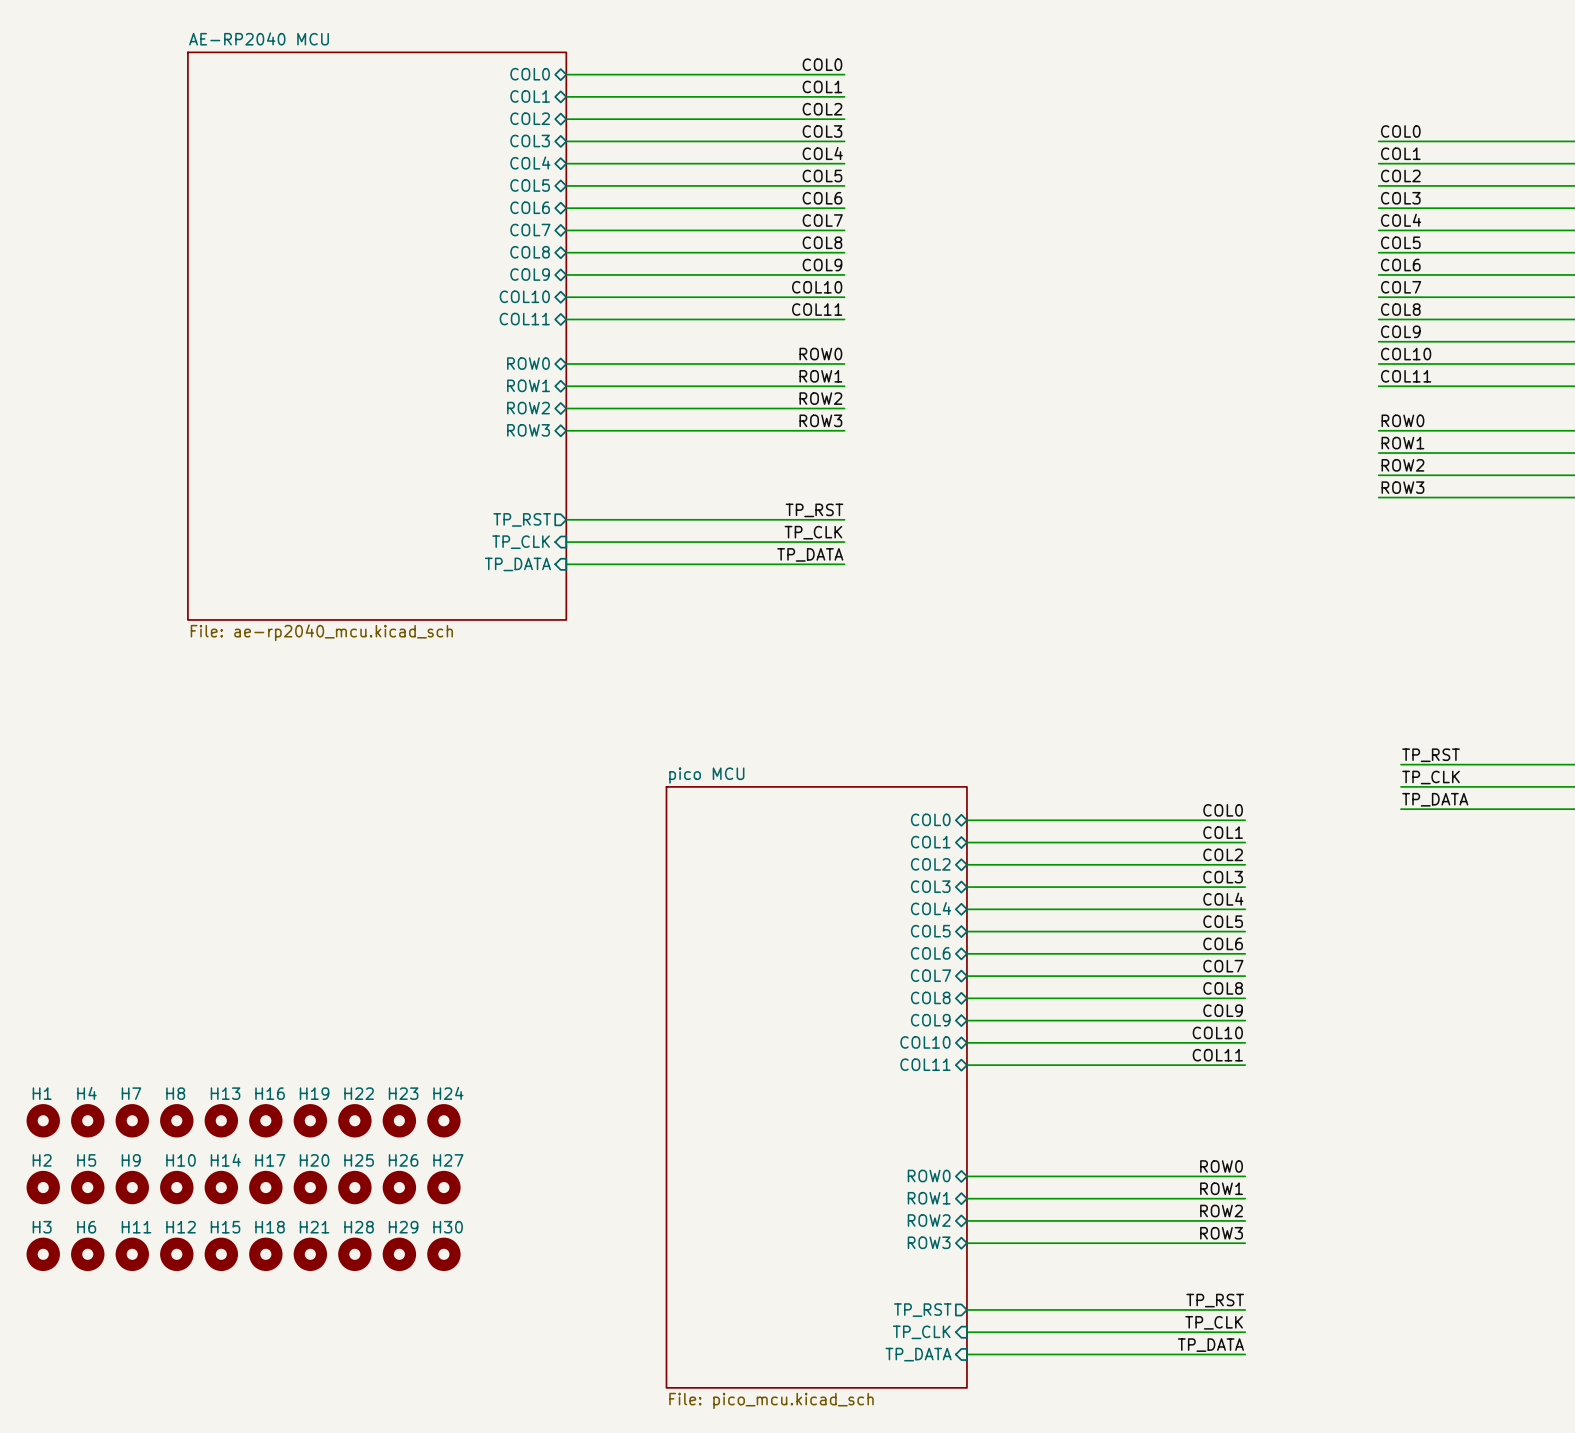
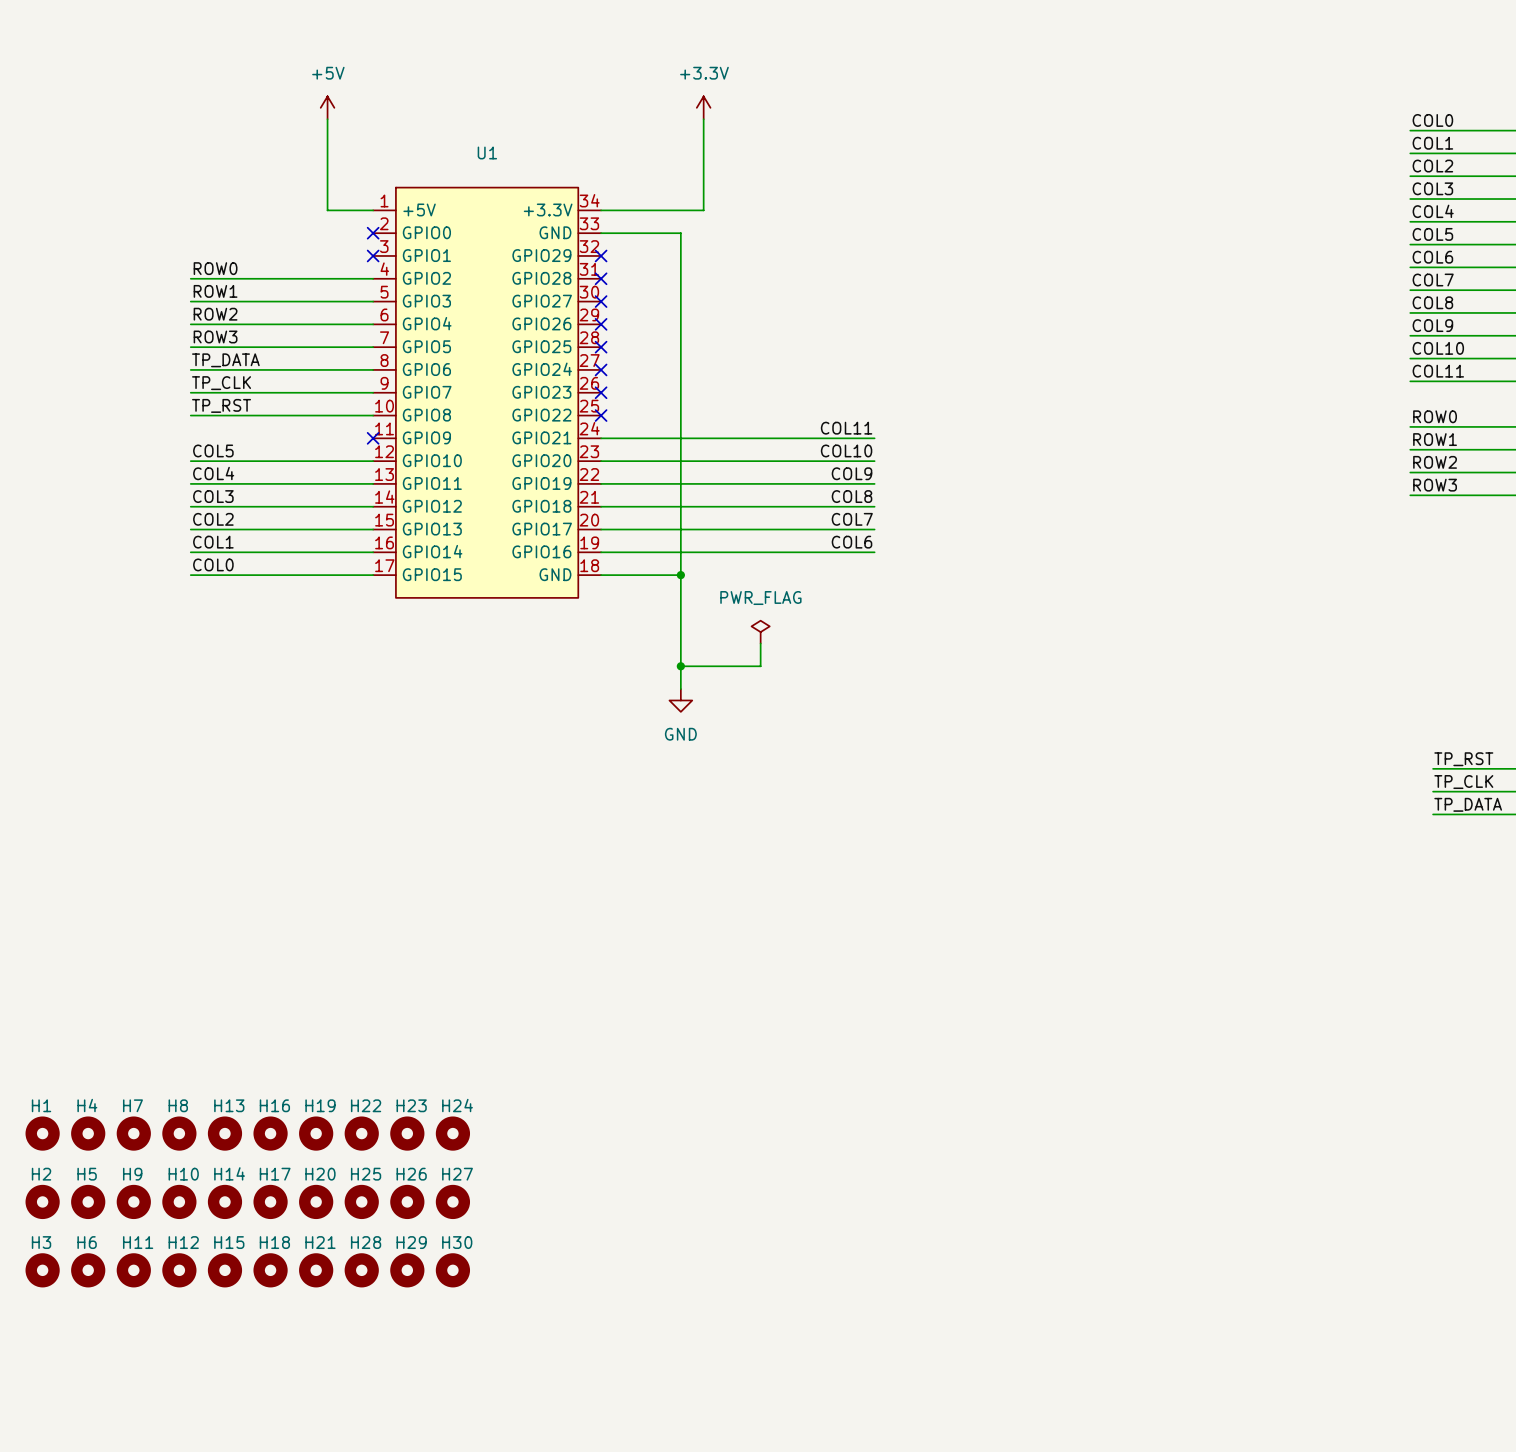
label: COL0 (822, 64) -> none
sheet pin: COL0 (530, 74) -> none
wire: (566, 74) (844, 74) -> none
label: COL1 (822, 86) -> none
sheet pin: COL1 (530, 96) -> none
wire: (566, 96) (844, 96) -> none
label: COL2 (822, 109) -> none
sheet pin: COL2 (530, 118) -> none
power symbol: none -> +5V (327, 107)
wire: (566, 119) (844, 119) -> none
power symbol: none -> +3.3V (703, 107)
wire: none -> (327, 119) (327, 210) (373, 210)
wire: none -> (703, 119) (703, 210) (601, 210)
label: COL3 (822, 131) -> none
sheet pin: COL3 (530, 140) -> none
wire: (566, 141) (844, 141) -> none
label: COL4 (822, 153) -> none
sheet pin: COL4 (530, 162) -> none
wire: (566, 163) (844, 163) -> none
label: COL5 (822, 175) -> none
sheet pin: COL5 (530, 185) -> none
wire: (566, 185) (844, 185) -> none
label: COL6 (822, 198) -> none
sheet pin: COL6 (530, 207) -> none
wire: (566, 208) (844, 208) -> none
label: COL7 (822, 220) -> none
sheet pin: COL7 (530, 230) -> none
wire: (566, 230) (844, 230) -> none
no-connect mark: none -> (373, 233)
wire: none -> (601, 233) (680, 233) (680, 689)
label: COL8 (822, 242) -> none
sheet pin: COL8 (530, 252) -> none
wire: (566, 252) (844, 252) -> none
no-connect mark: none -> (373, 255)
no-connect mark: none -> (601, 255)
label position: COL9 (822, 265) -> COL9 (852, 473)
sheet pin: COL9 (530, 274) -> none
wire: (566, 274) (844, 274) -> none
label: none -> ROW0 (215, 268)
wire: none -> (190, 278) (373, 278)
no-connect mark: none -> (601, 278)
label position: COL10 (817, 287) -> COL10 (846, 450)
sheet pin: COL10 (524, 296) -> none
wire: (566, 297) (844, 297) -> none
label: none -> ROW1 (215, 291)
wire: none -> (190, 301) (373, 301)
no-connect mark: none -> (601, 301)
label position: COL11 (817, 309) -> COL11 (846, 428)
sheet pin: COL11 (524, 319) -> none
wire: (566, 319) (844, 319) -> none
label: none -> ROW2 (215, 314)
wire: none -> (190, 324) (373, 324)
no-connect mark: none -> (601, 324)
sheet AE-RP2040 MCU: File: ae-rp2040_mcu.kicad_sch (377, 336) -> none
label: none -> ROW3 (215, 336)
wire: none -> (190, 347) (373, 347)
no-connect mark: none -> (601, 347)
label: ROW0 (820, 354) -> none
sheet pin: ROW0 (528, 363) -> none
wire: (566, 363) (844, 363) -> none
label: none -> TP_DATA (225, 360)
wire: none -> (190, 369) (373, 369)
no-connect mark: none -> (601, 369)
label: ROW1 (820, 376) -> none
sheet pin: ROW1 (528, 385) -> none
wire: (566, 386) (844, 386) -> none
label: none -> TP_CLK (221, 383)
wire: none -> (190, 392) (373, 392)
U1: none -> (487, 392)
no-connect mark: none -> (601, 392)
label: ROW2 (820, 398) -> none
sheet pin: ROW2 (528, 408) -> none
wire: (566, 408) (844, 408) -> none
label: none -> TP_RST (221, 405)
wire: none -> (190, 415) (373, 415)
no-connect mark: none -> (601, 415)
label: ROW3 (820, 420) -> none
sheet pin: ROW3 (528, 430) -> none
wire: (566, 430) (844, 430) -> none
no-connect mark: none -> (373, 438)
wire: none -> (601, 438) (874, 438)
label: none -> COL5 (213, 450)
wire: none -> (190, 461) (373, 461)
wire: none -> (601, 461) (874, 461)
label: none -> COL4 (213, 473)
wire: none -> (190, 483) (373, 483)
wire: none -> (601, 483) (874, 483)
label: none -> COL3 (213, 496)
label: none -> COL8 (852, 496)
wire: none -> (190, 506) (373, 506)
wire: none -> (601, 506) (874, 506)
label: TP_RST (814, 510) -> none
sheet pin: TP_RST (522, 519) -> none
wire: (566, 519) (844, 519) -> none
label: none -> COL2 (213, 519)
label: none -> COL7 (852, 519)
wire: none -> (190, 529) (373, 529)
wire: none -> (601, 529) (874, 529)
label: TP_CLK (813, 532) -> none
sheet pin: TP_CLK (521, 542) -> none
wire: (566, 542) (844, 542) -> none
label: none -> COL1 (213, 542)
label: none -> COL6 (852, 542)
wire: none -> (190, 552) (373, 552)
wire: none -> (601, 552) (874, 552)
label: TP_DATA (810, 554) -> none
sheet pin: TP_DATA (517, 564) -> none
wire: (566, 564) (844, 564) -> none
label: none -> COL0 (213, 564)
wire: none -> (190, 575) (373, 575)
wire: none -> (601, 575) (680, 575)
junction: none -> (680, 575)
power symbol: none -> PWR_FLAG (760, 632)
wire: none -> (760, 643) (760, 666) (680, 666)
junction: none -> (680, 666)
power symbol: none -> GND (680, 700)
label: COL0 (1223, 810) -> none
sheet pin: COL0 (930, 819) -> none
wire: (966, 820) (1245, 820) -> none
label: COL1 (1223, 832) -> none
sheet pin: COL1 (930, 842) -> none
wire: (966, 842) (1245, 842) -> none
label: COL2 (1223, 854) -> none
sheet pin: COL2 (930, 864) -> none
wire: (966, 864) (1245, 864) -> none
label: COL3 (1223, 877) -> none
sheet pin: COL3 (930, 886) -> none
wire: (966, 887) (1245, 887) -> none
label: COL4 (1223, 899) -> none
sheet pin: COL4 (931, 908) -> none
wire: (966, 909) (1245, 909) -> none
label: COL5 (1223, 921) -> none
sheet pin: COL5 (930, 931) -> none
wire: (966, 931) (1245, 931) -> none
label: COL6 (1223, 943) -> none
sheet pin: COL6 (930, 953) -> none
wire: (966, 953) (1245, 953) -> none
label: COL7 (1223, 966) -> none
sheet pin: COL7 (931, 975) -> none
wire: (966, 976) (1245, 976) -> none
label: COL8 (1223, 988) -> none
sheet pin: COL8 (930, 997) -> none
wire: (966, 998) (1245, 998) -> none
label: COL9 (1223, 1010) -> none
sheet pin: COL9 (930, 1020) -> none
wire: (966, 1020) (1245, 1020) -> none
label: COL10 (1217, 1032) -> none
sheet pin: COL10 (925, 1042) -> none
wire: (966, 1042) (1245, 1042) -> none
label: COL11 (1217, 1055) -> none
sheet pin: COL11 (925, 1064) -> none
wire: (966, 1065) (1245, 1065) -> none
sheet pico MCU: File: pico_mcu.kicad_sch (816, 1087) -> none
label: ROW0 (1221, 1166) -> none
sheet pin: ROW0 (929, 1176) -> none
wire: (966, 1176) (1245, 1176) -> none
label: ROW1 (1221, 1188) -> none
sheet pin: ROW1 (929, 1198) -> none
wire: (966, 1198) (1245, 1198) -> none
label: ROW2 (1221, 1211) -> none
sheet pin: ROW2 (929, 1220) -> none
wire: (966, 1220) (1245, 1220) -> none
label: ROW3 (1221, 1233) -> none
sheet pin: ROW3 (929, 1242) -> none
wire: (966, 1243) (1245, 1243) -> none
label: TP_RST (1215, 1300) -> none
wire: (966, 1309) (1245, 1309) -> none
sheet pin: TP_RST (922, 1310) -> none
label: TP_CLK (1214, 1322) -> none
sheet pin: TP_CLK (921, 1332) -> none
wire: (966, 1332) (1245, 1332) -> none
label: TP_DATA (1210, 1345) -> none
sheet pin: TP_DATA (918, 1354) -> none
wire: (966, 1354) (1245, 1354) -> none

